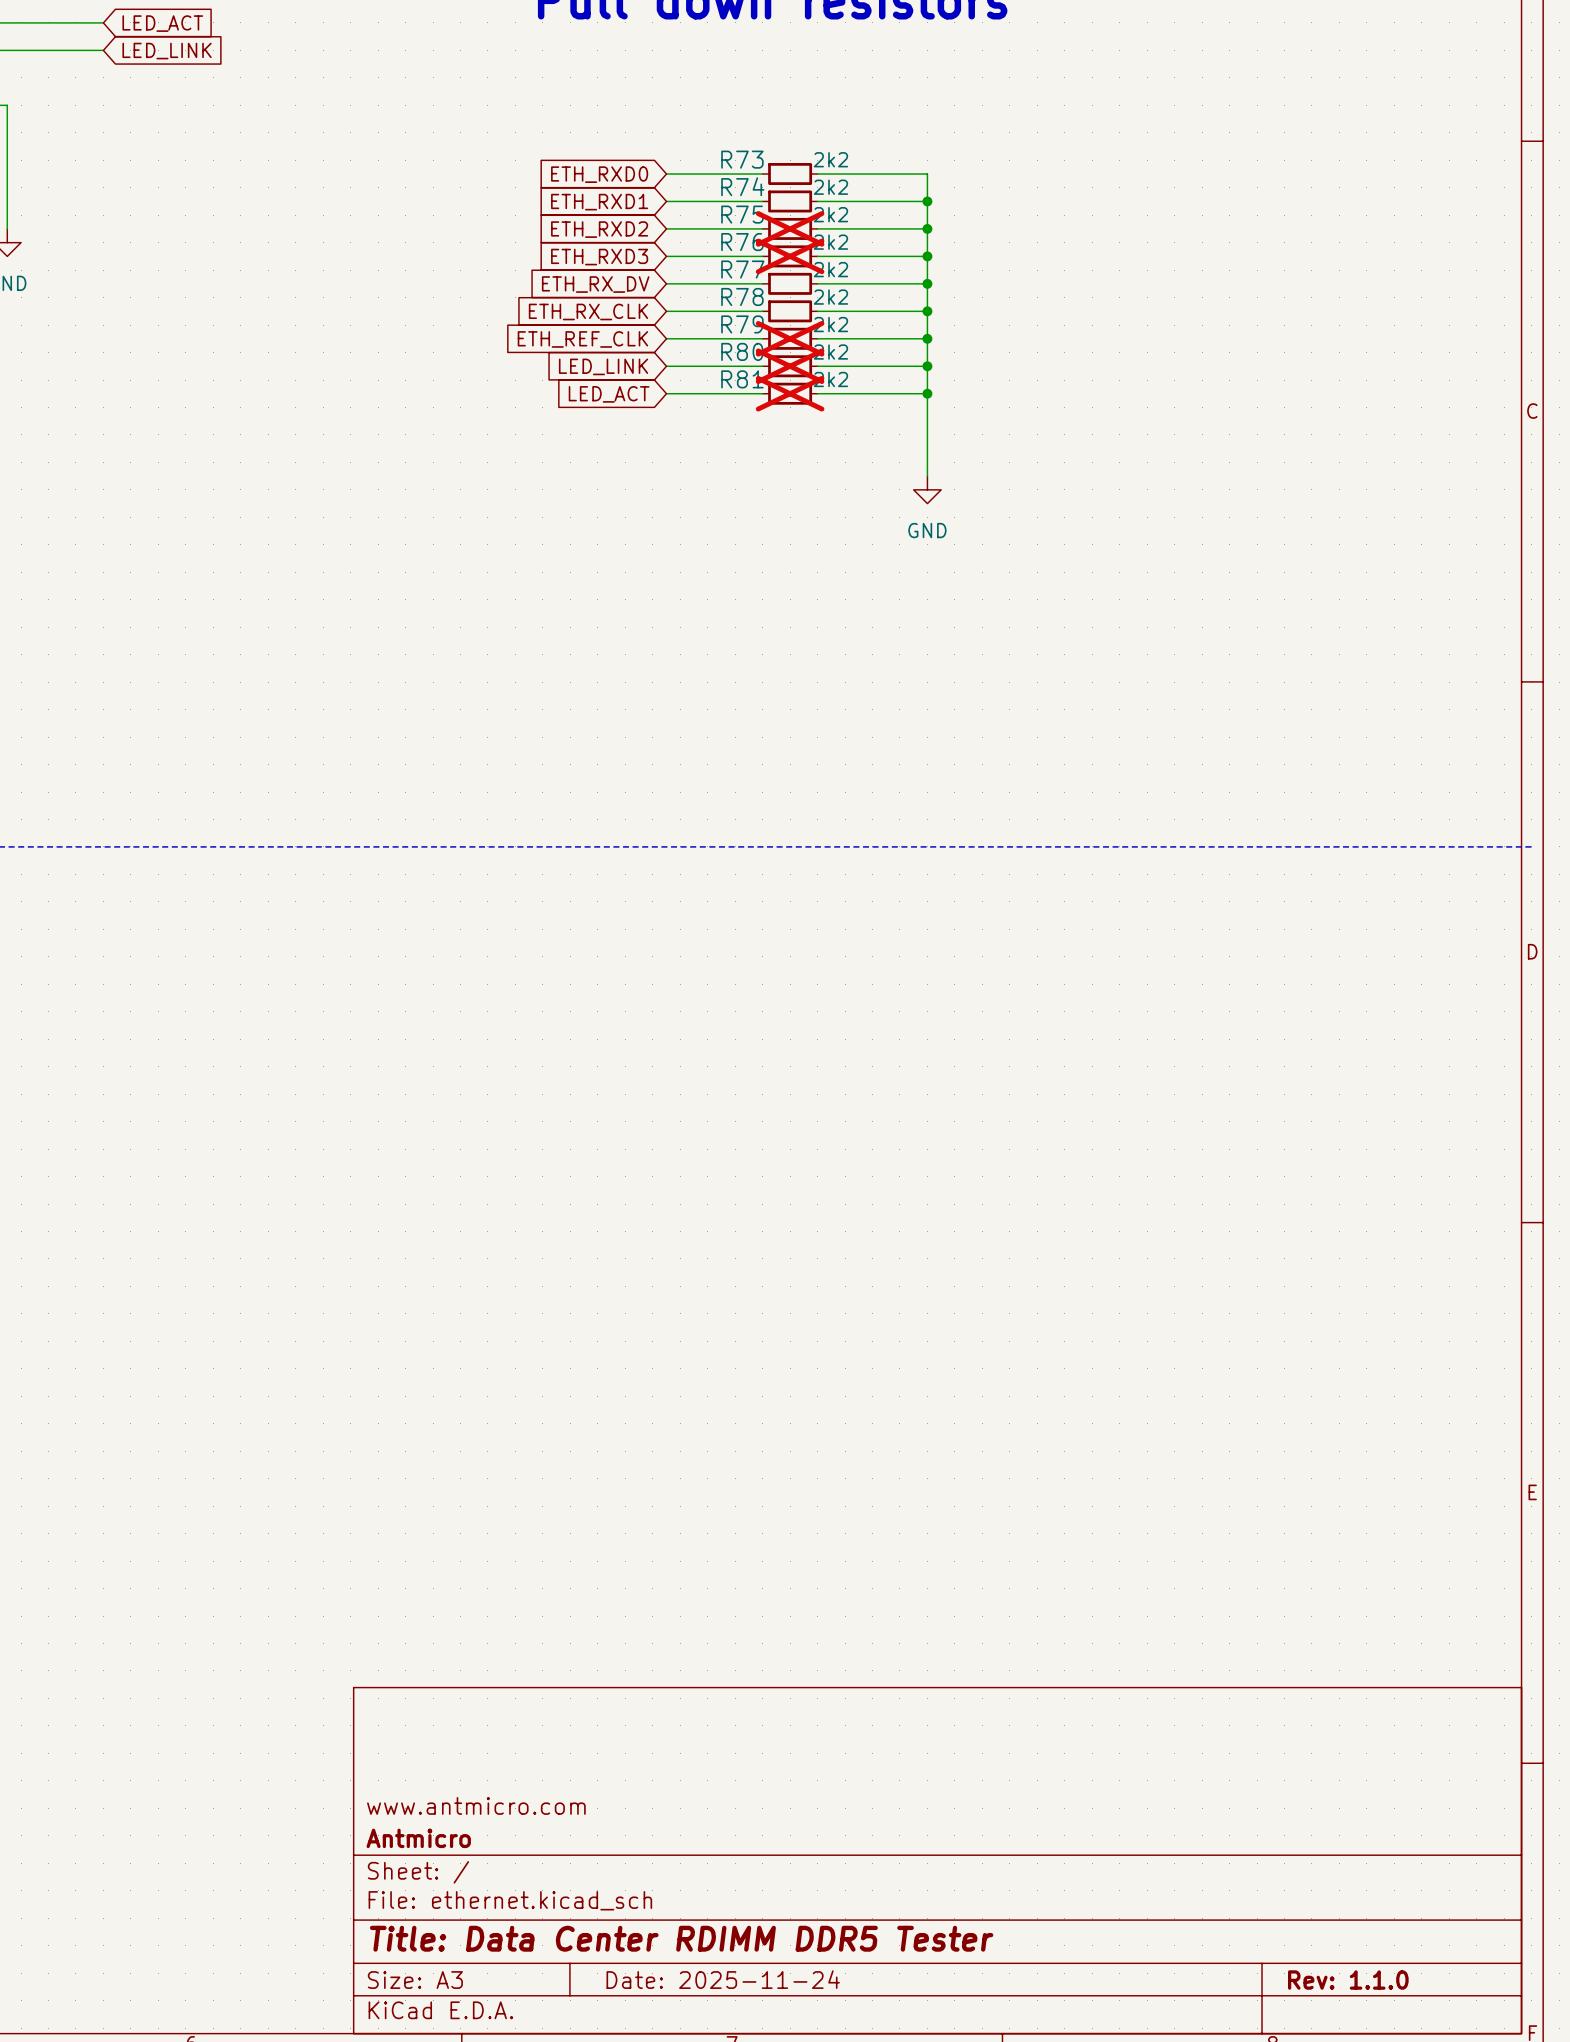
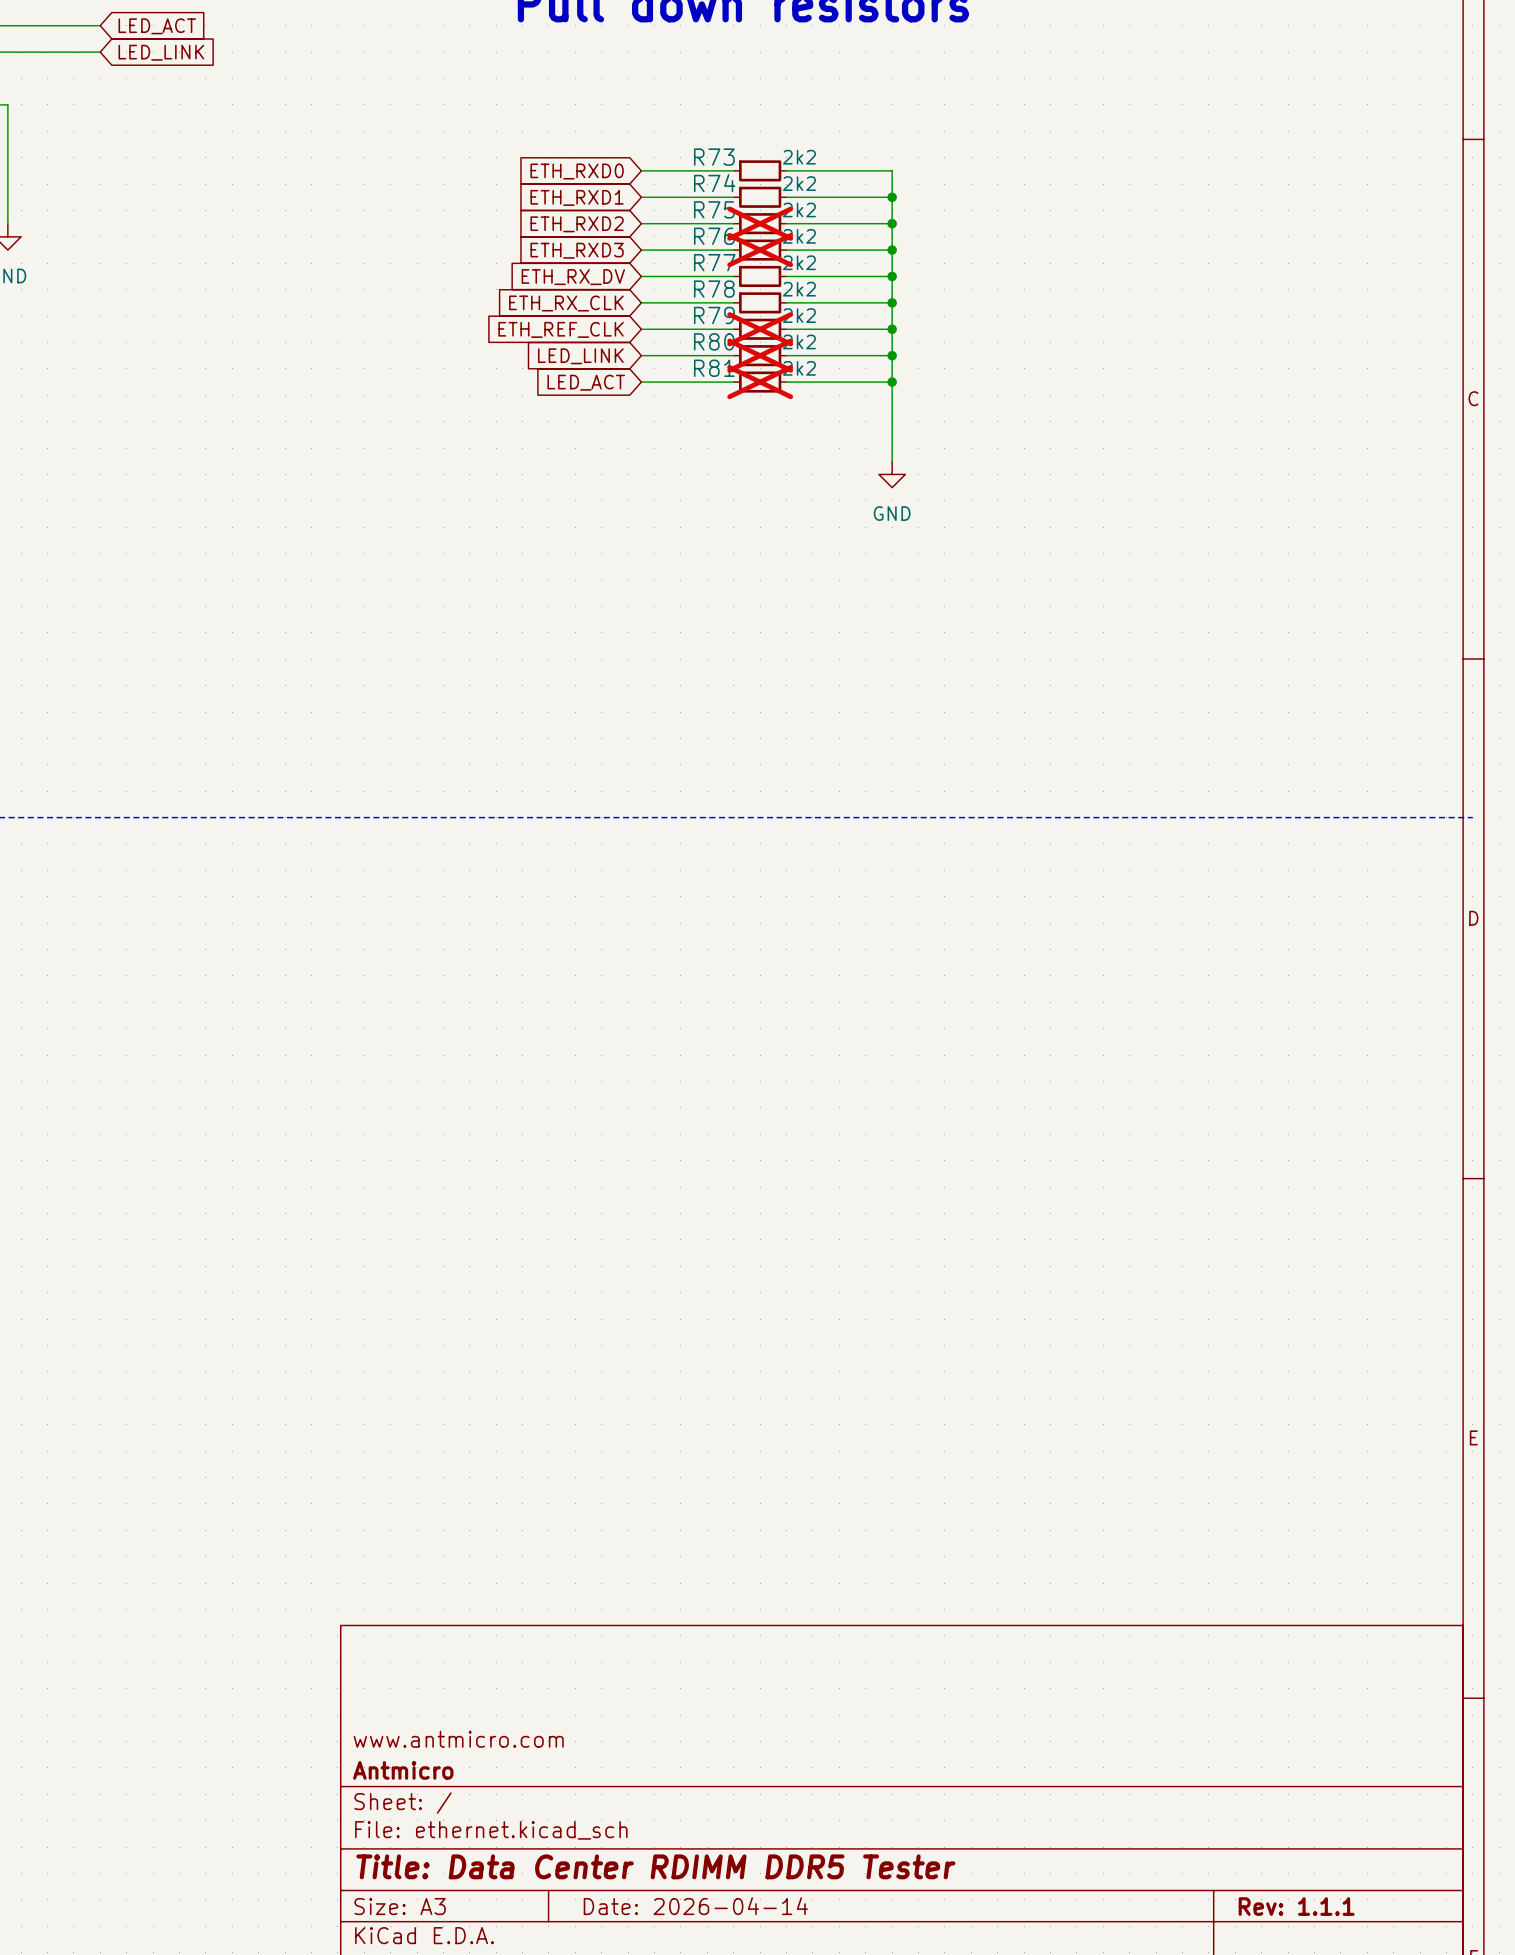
title block: Date: 2025-11-24 (723, 1979) -> Date: 2026-04-14 (695, 1906)
title block: Rev: 1.1.0 (1348, 1980) -> Rev: 1.1.1 (1296, 1906)

